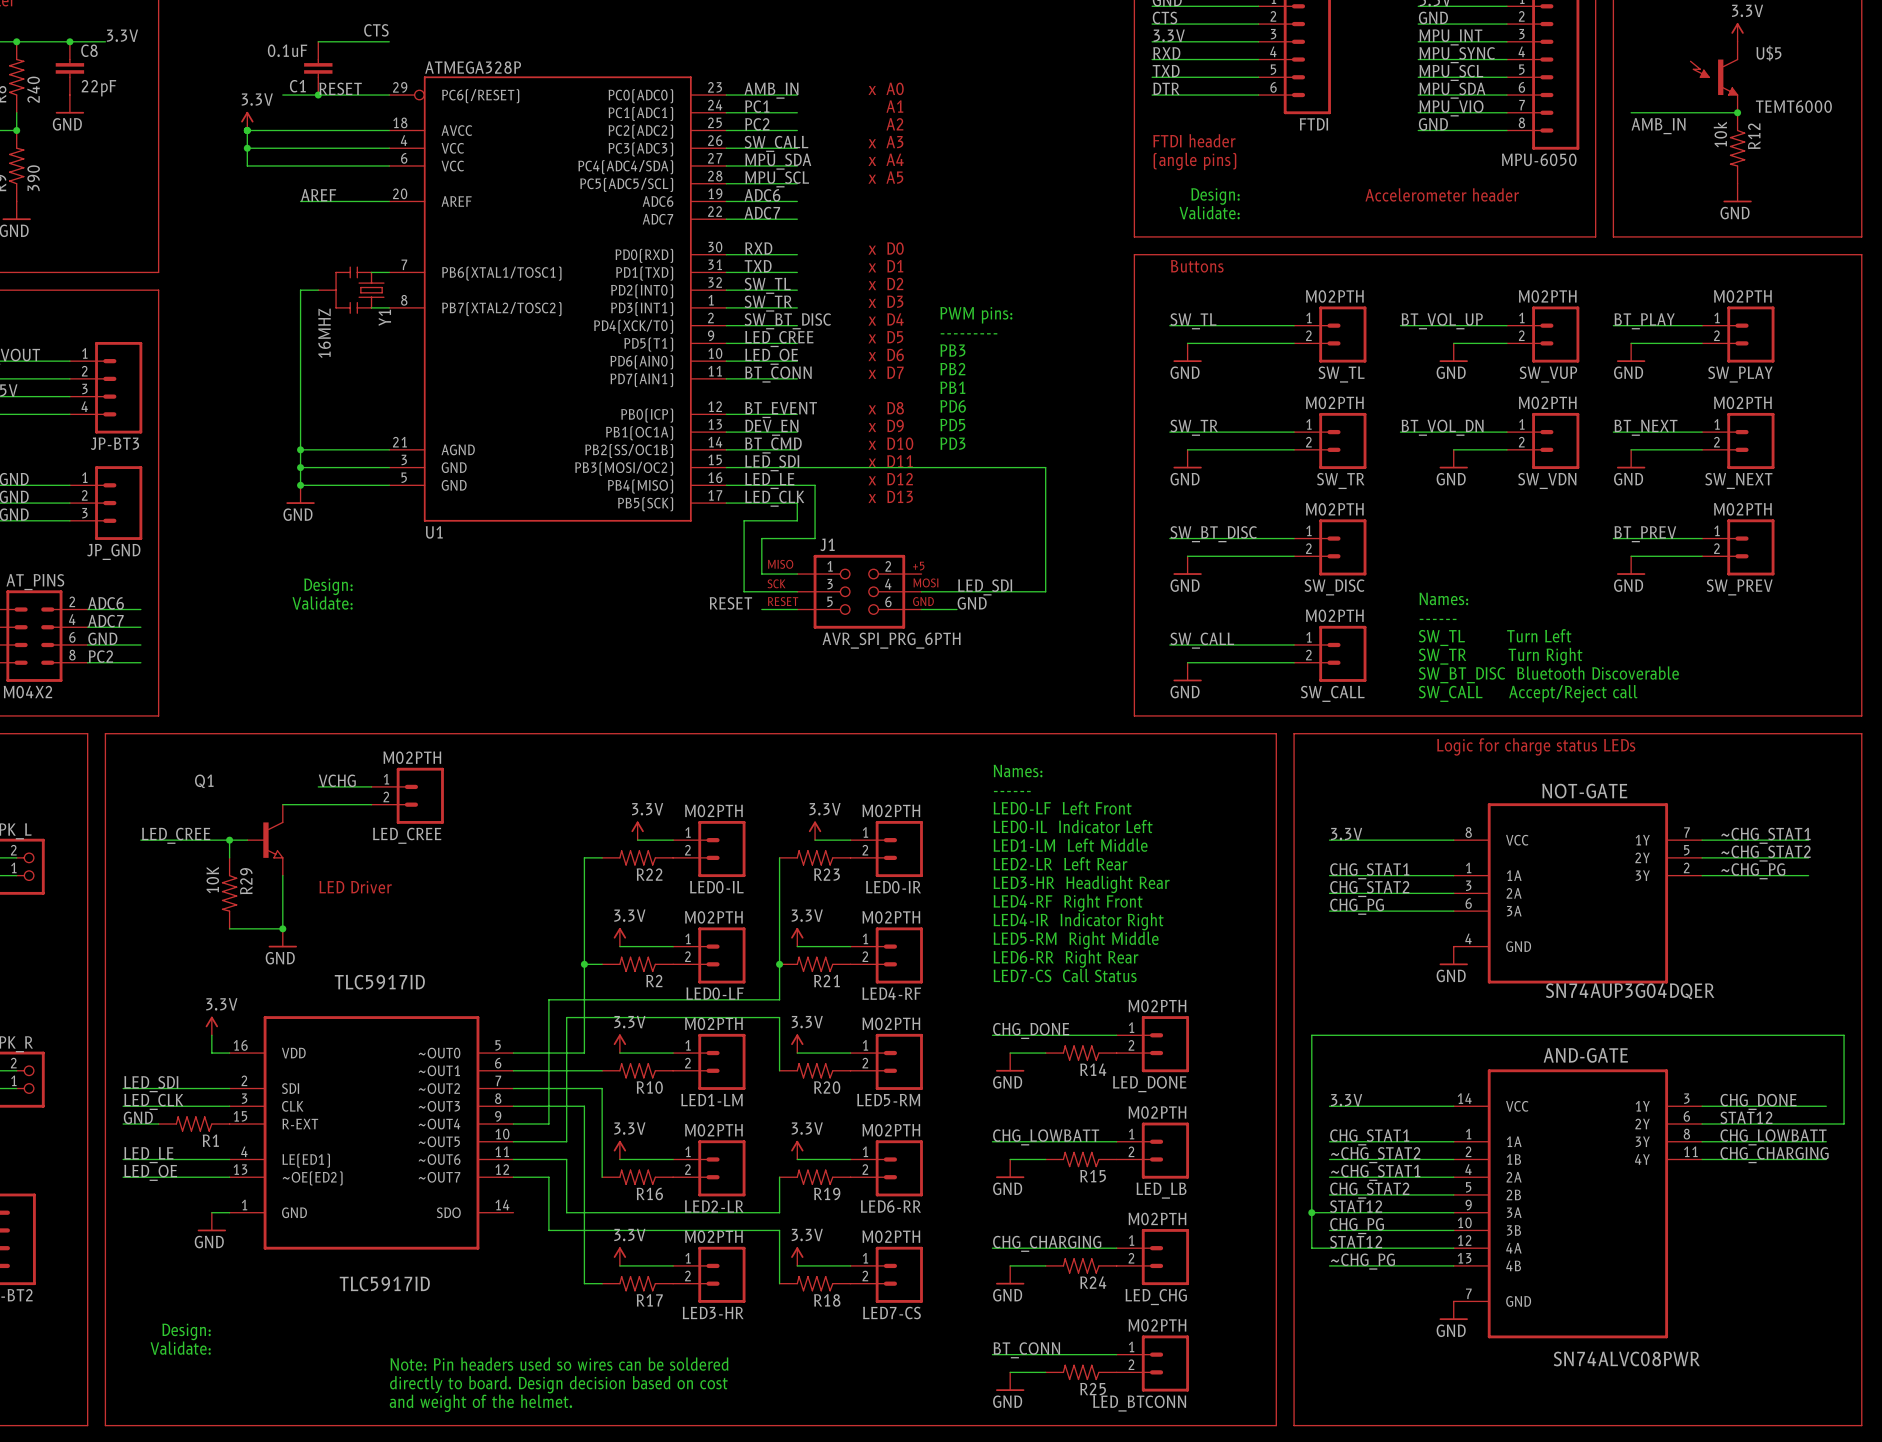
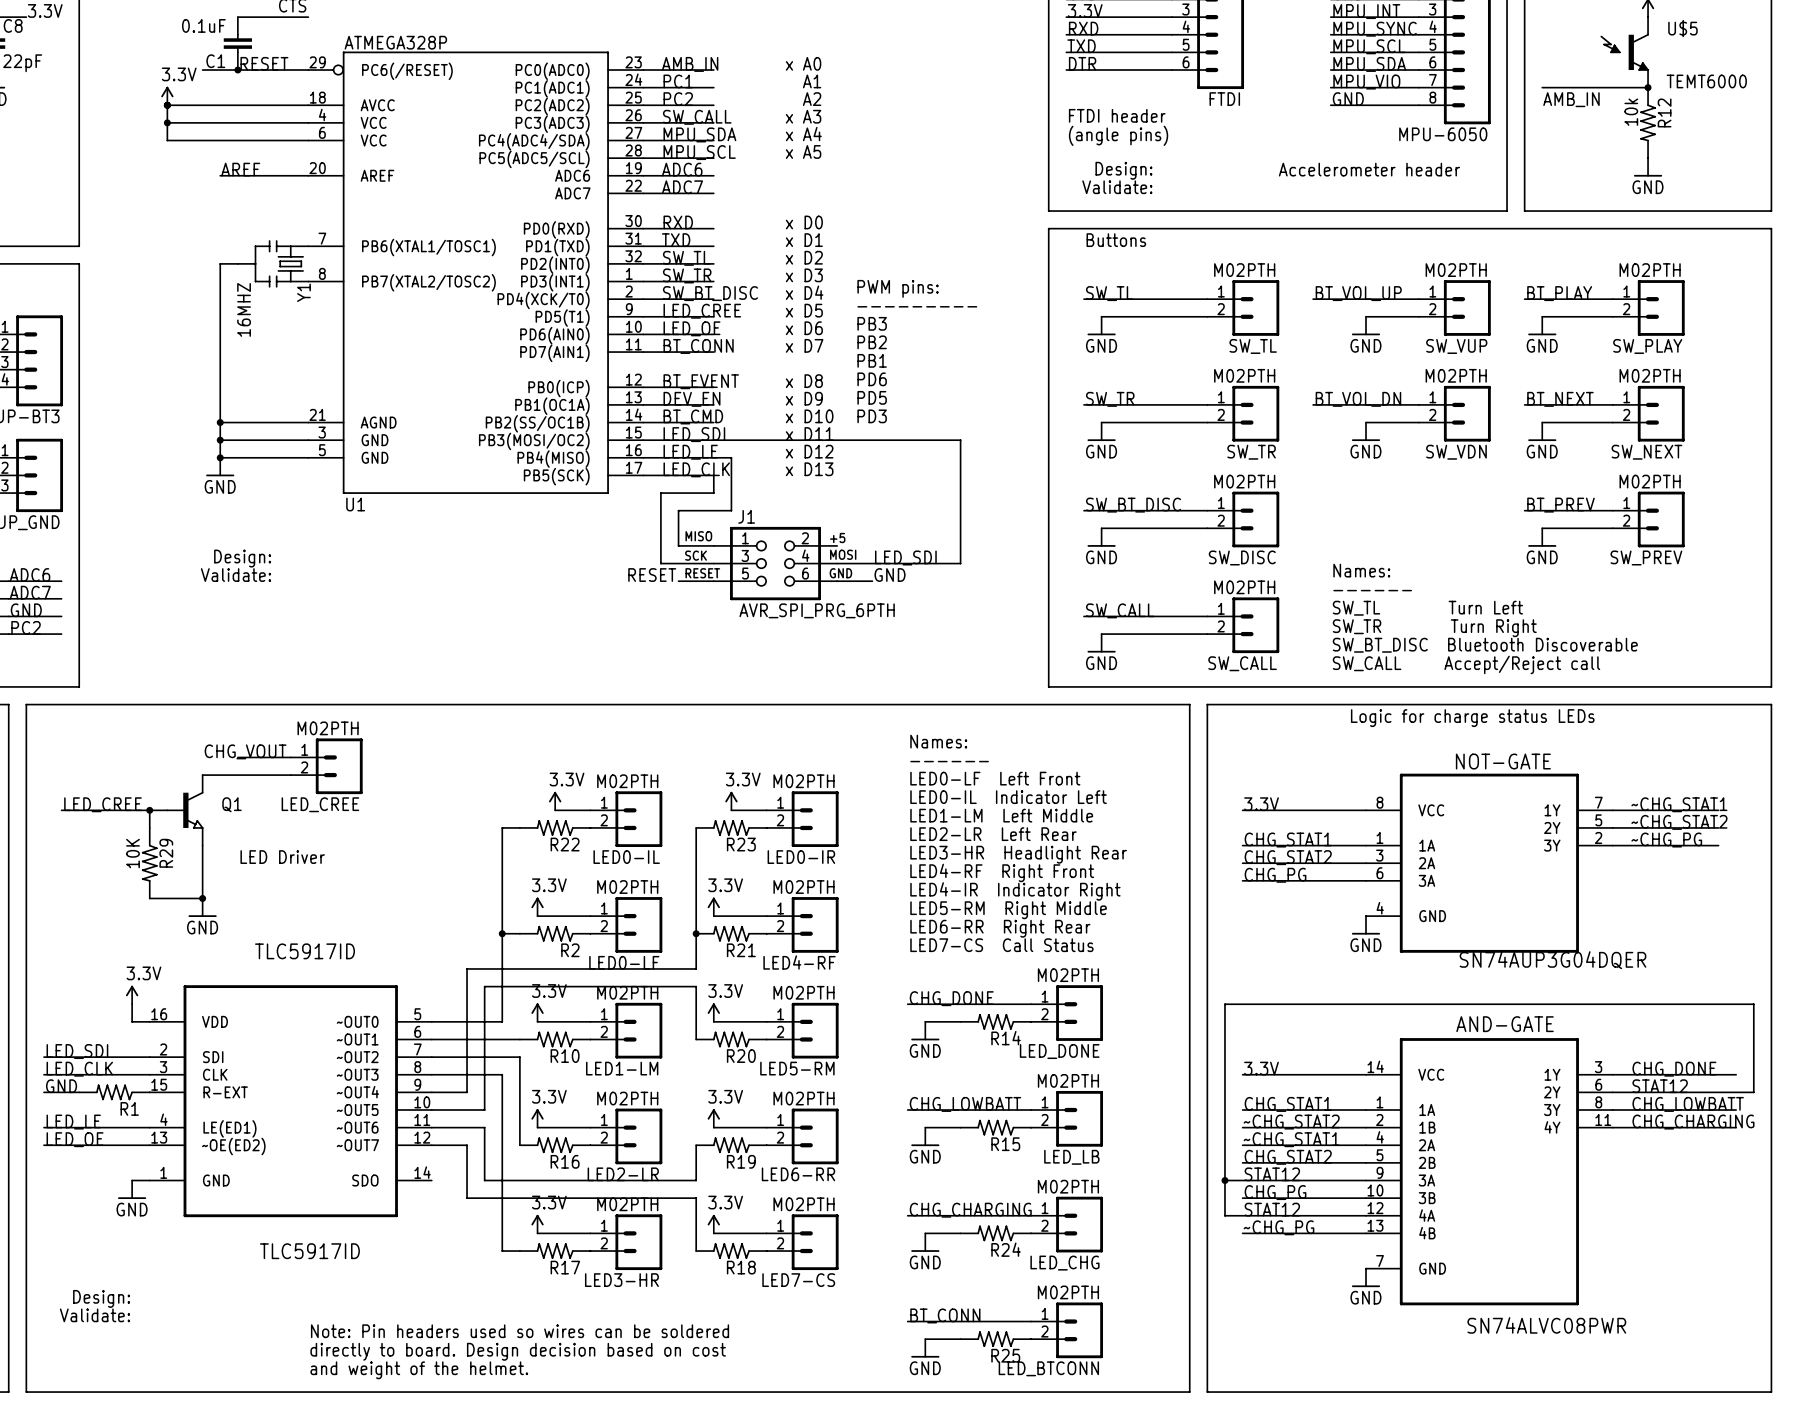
label: VCHG (337, 780) -> none
Q1 name position: Q1 (204, 781) -> Q1 (232, 804)
label: none -> CHG_VOUT (245, 751)

